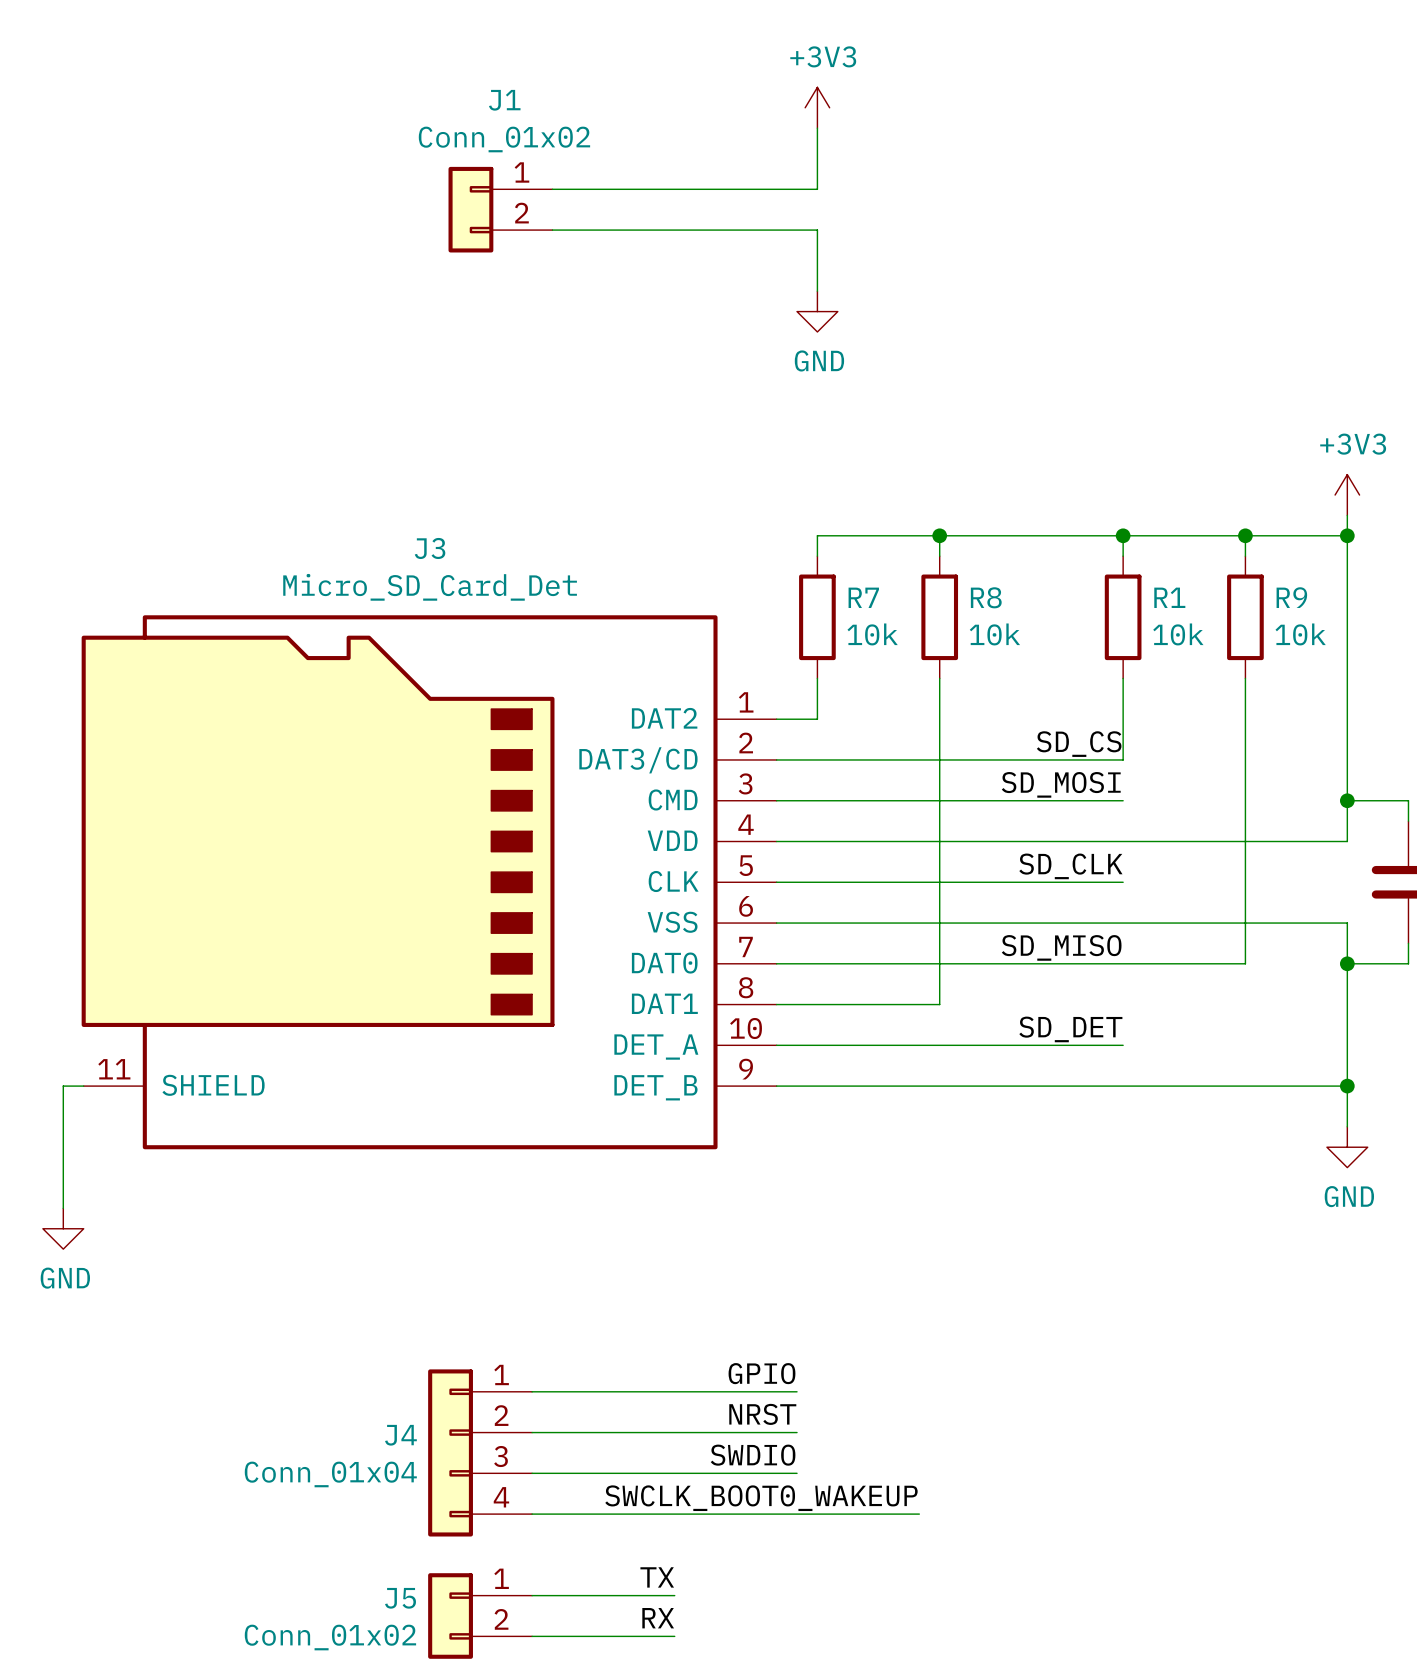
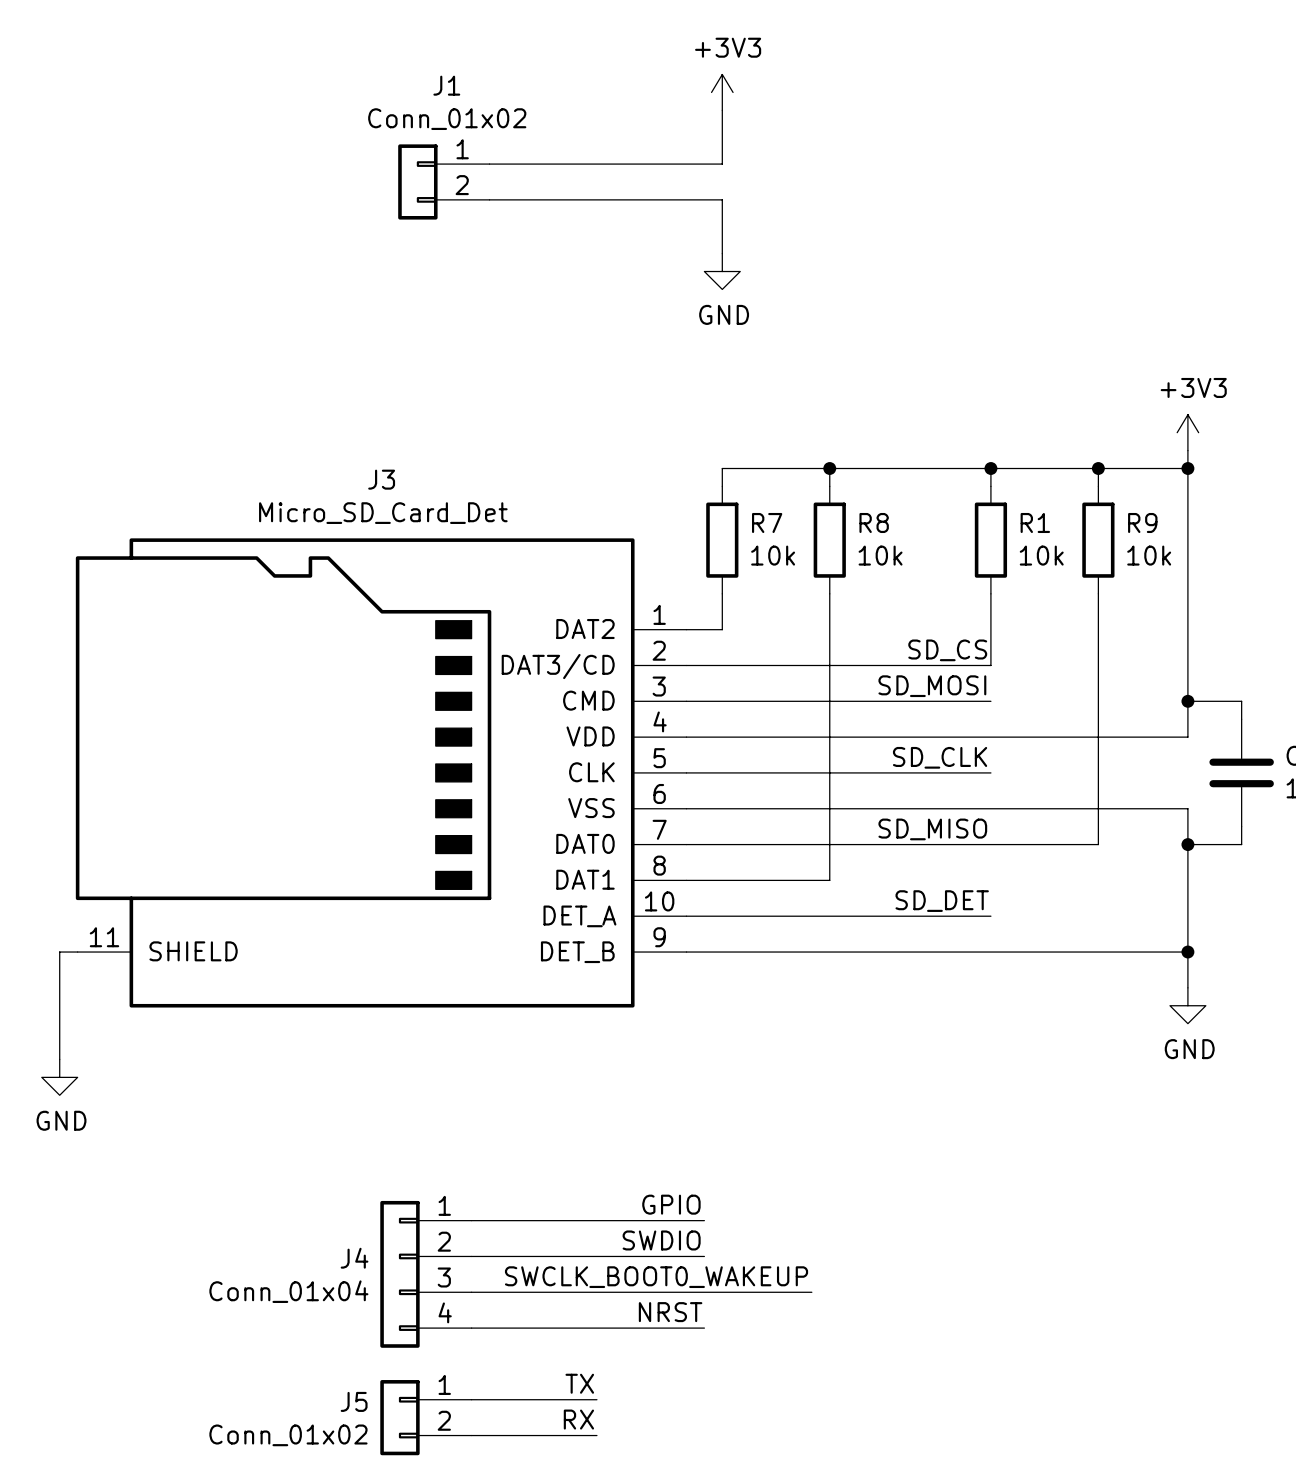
label: NRST (762, 1414) -> SWDIO (661, 1240)
label: SWDIO (753, 1455) -> none
label: none -> NRST (670, 1312)
label position: SWCLK_BOOT0_WAKEUP (761, 1498) -> SWCLK_BOOT0_WAKEUP (656, 1277)
wire: (797, 1514) (919, 1514) -> (704, 1292) (811, 1292)

